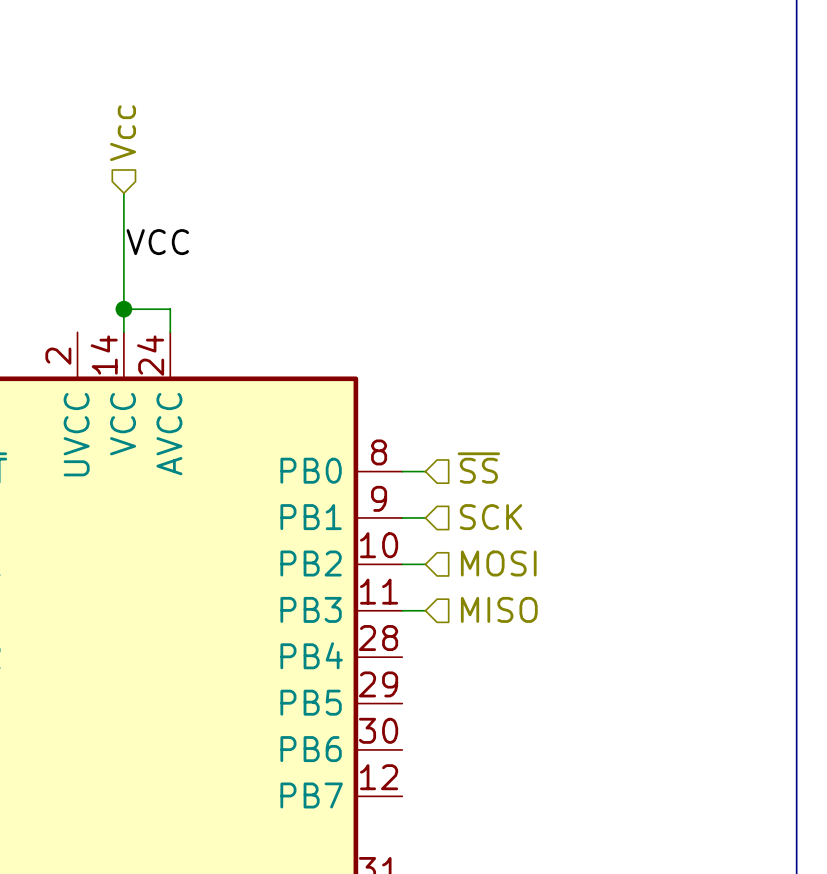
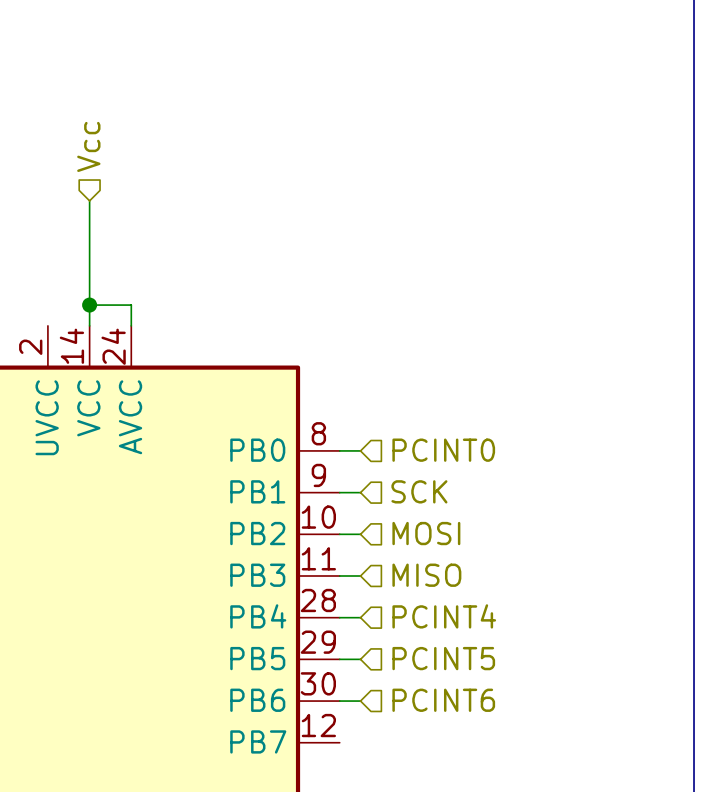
label: VCC (157, 242) -> none
hierarchical label: ~{SS} (478, 468) -> PCINT0 (443, 450)
hierarchical label: none -> PCINT4 (444, 616)
wire: none -> (339, 617) (360, 617)
hierarchical label: none -> PCINT5 (443, 658)
wire: none -> (339, 659) (360, 659)
wire: none -> (339, 701) (360, 701)
hierarchical label: none -> PCINT6 (443, 700)

